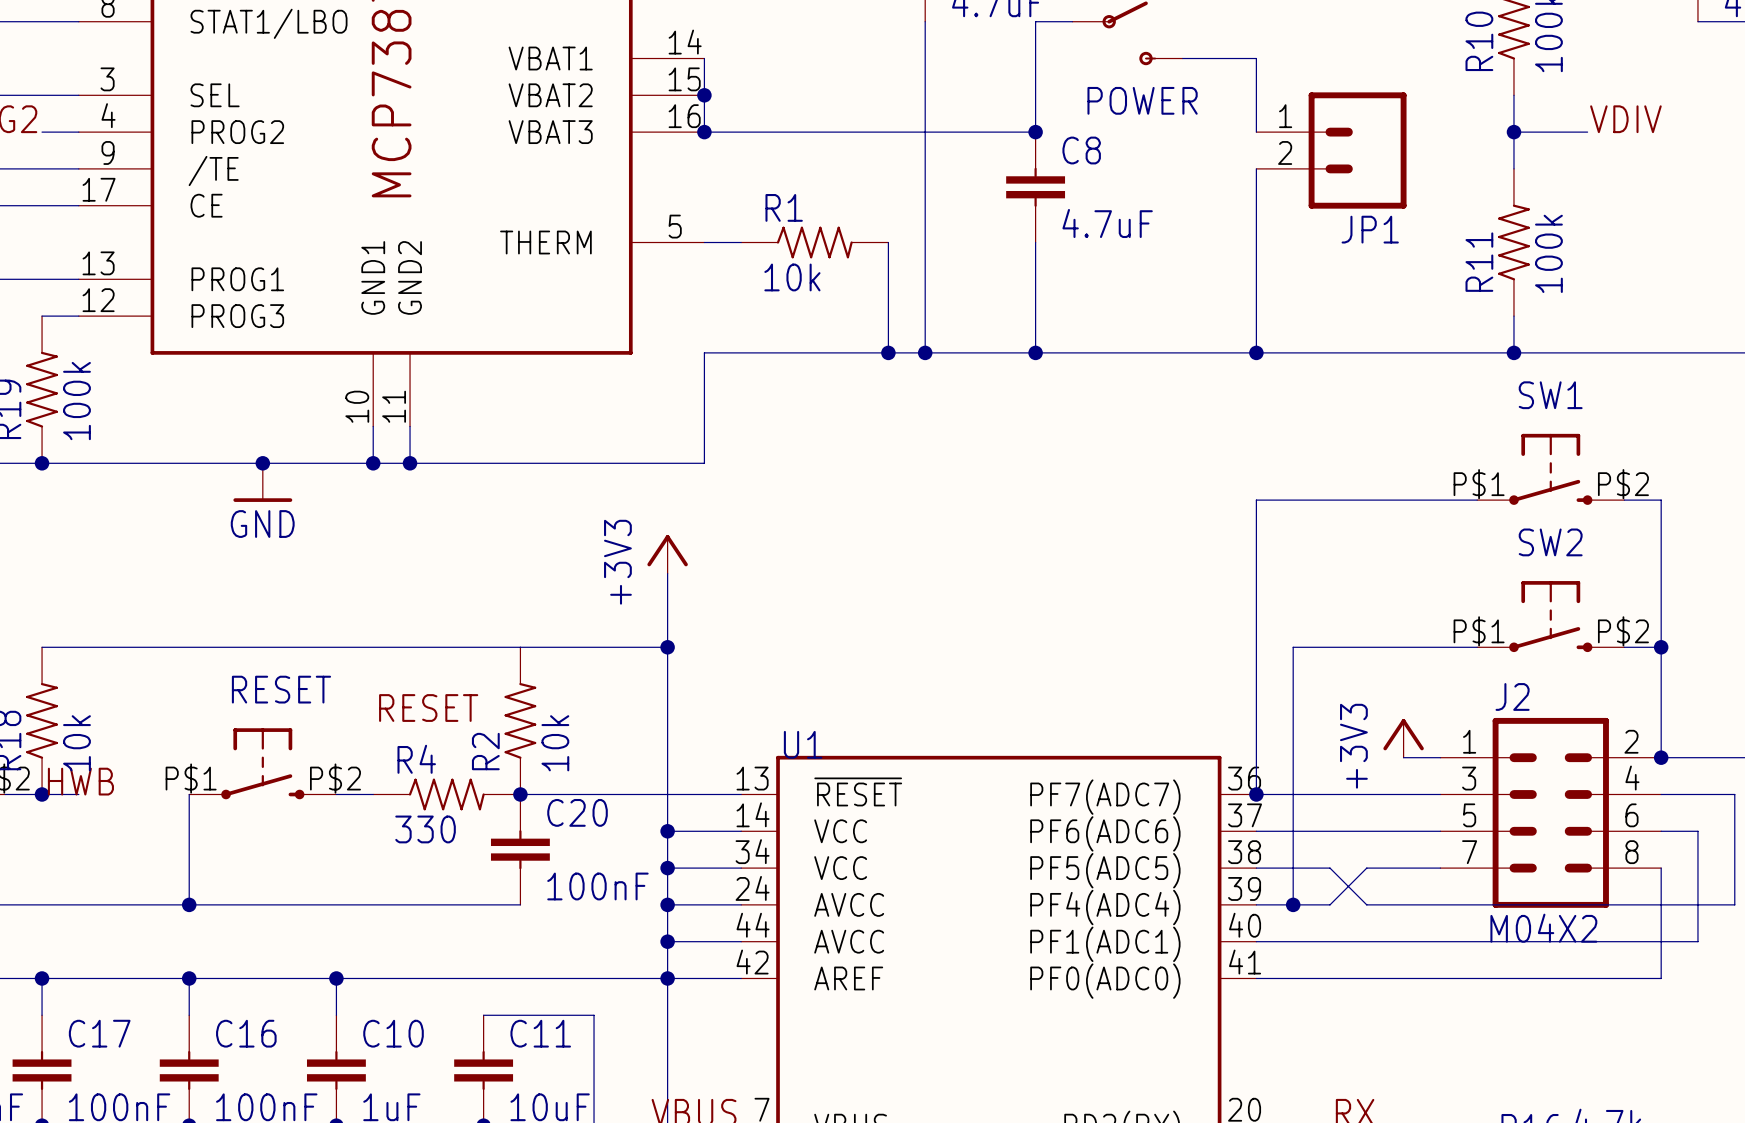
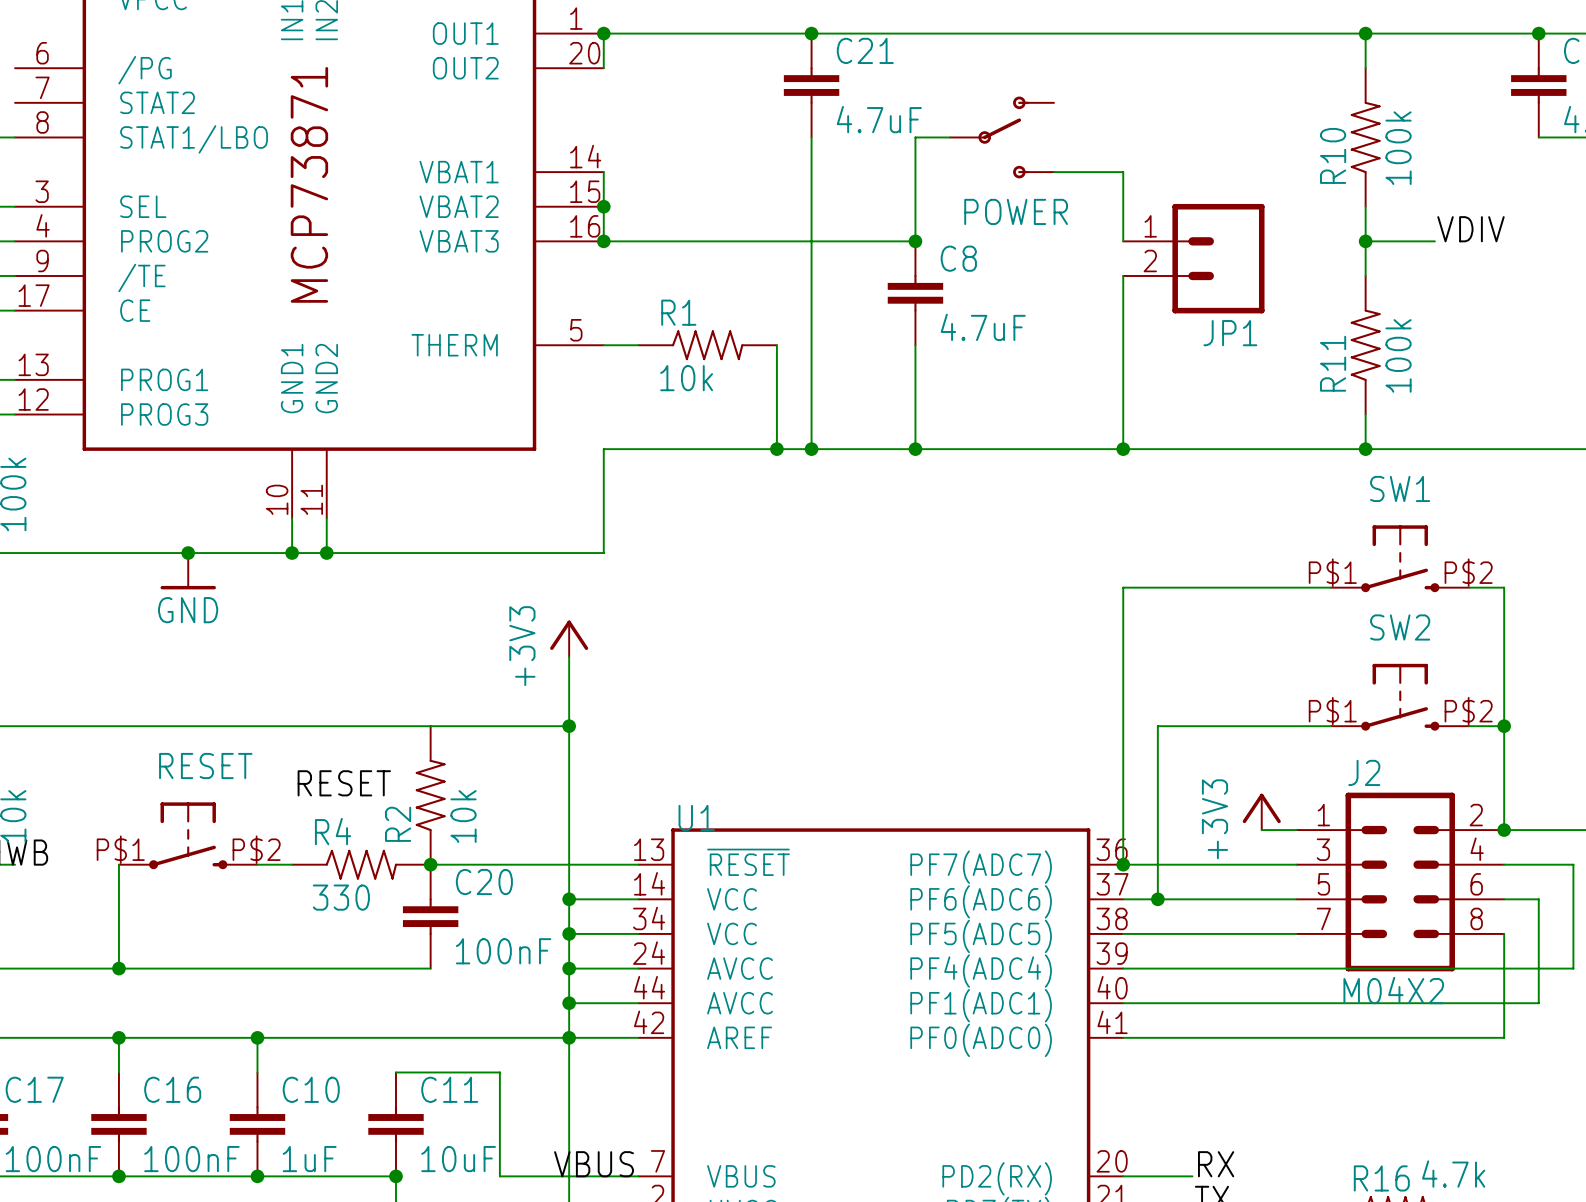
wire: (1293, 831) (1293, 904) -> none
wire: (1329, 868) (1366, 904) -> (1192, 933) (1227, 933)
wire: (1366, 868) (1329, 904) -> (1227, 968) (1192, 968)
junction position: (1293, 904) -> (1157, 899)

